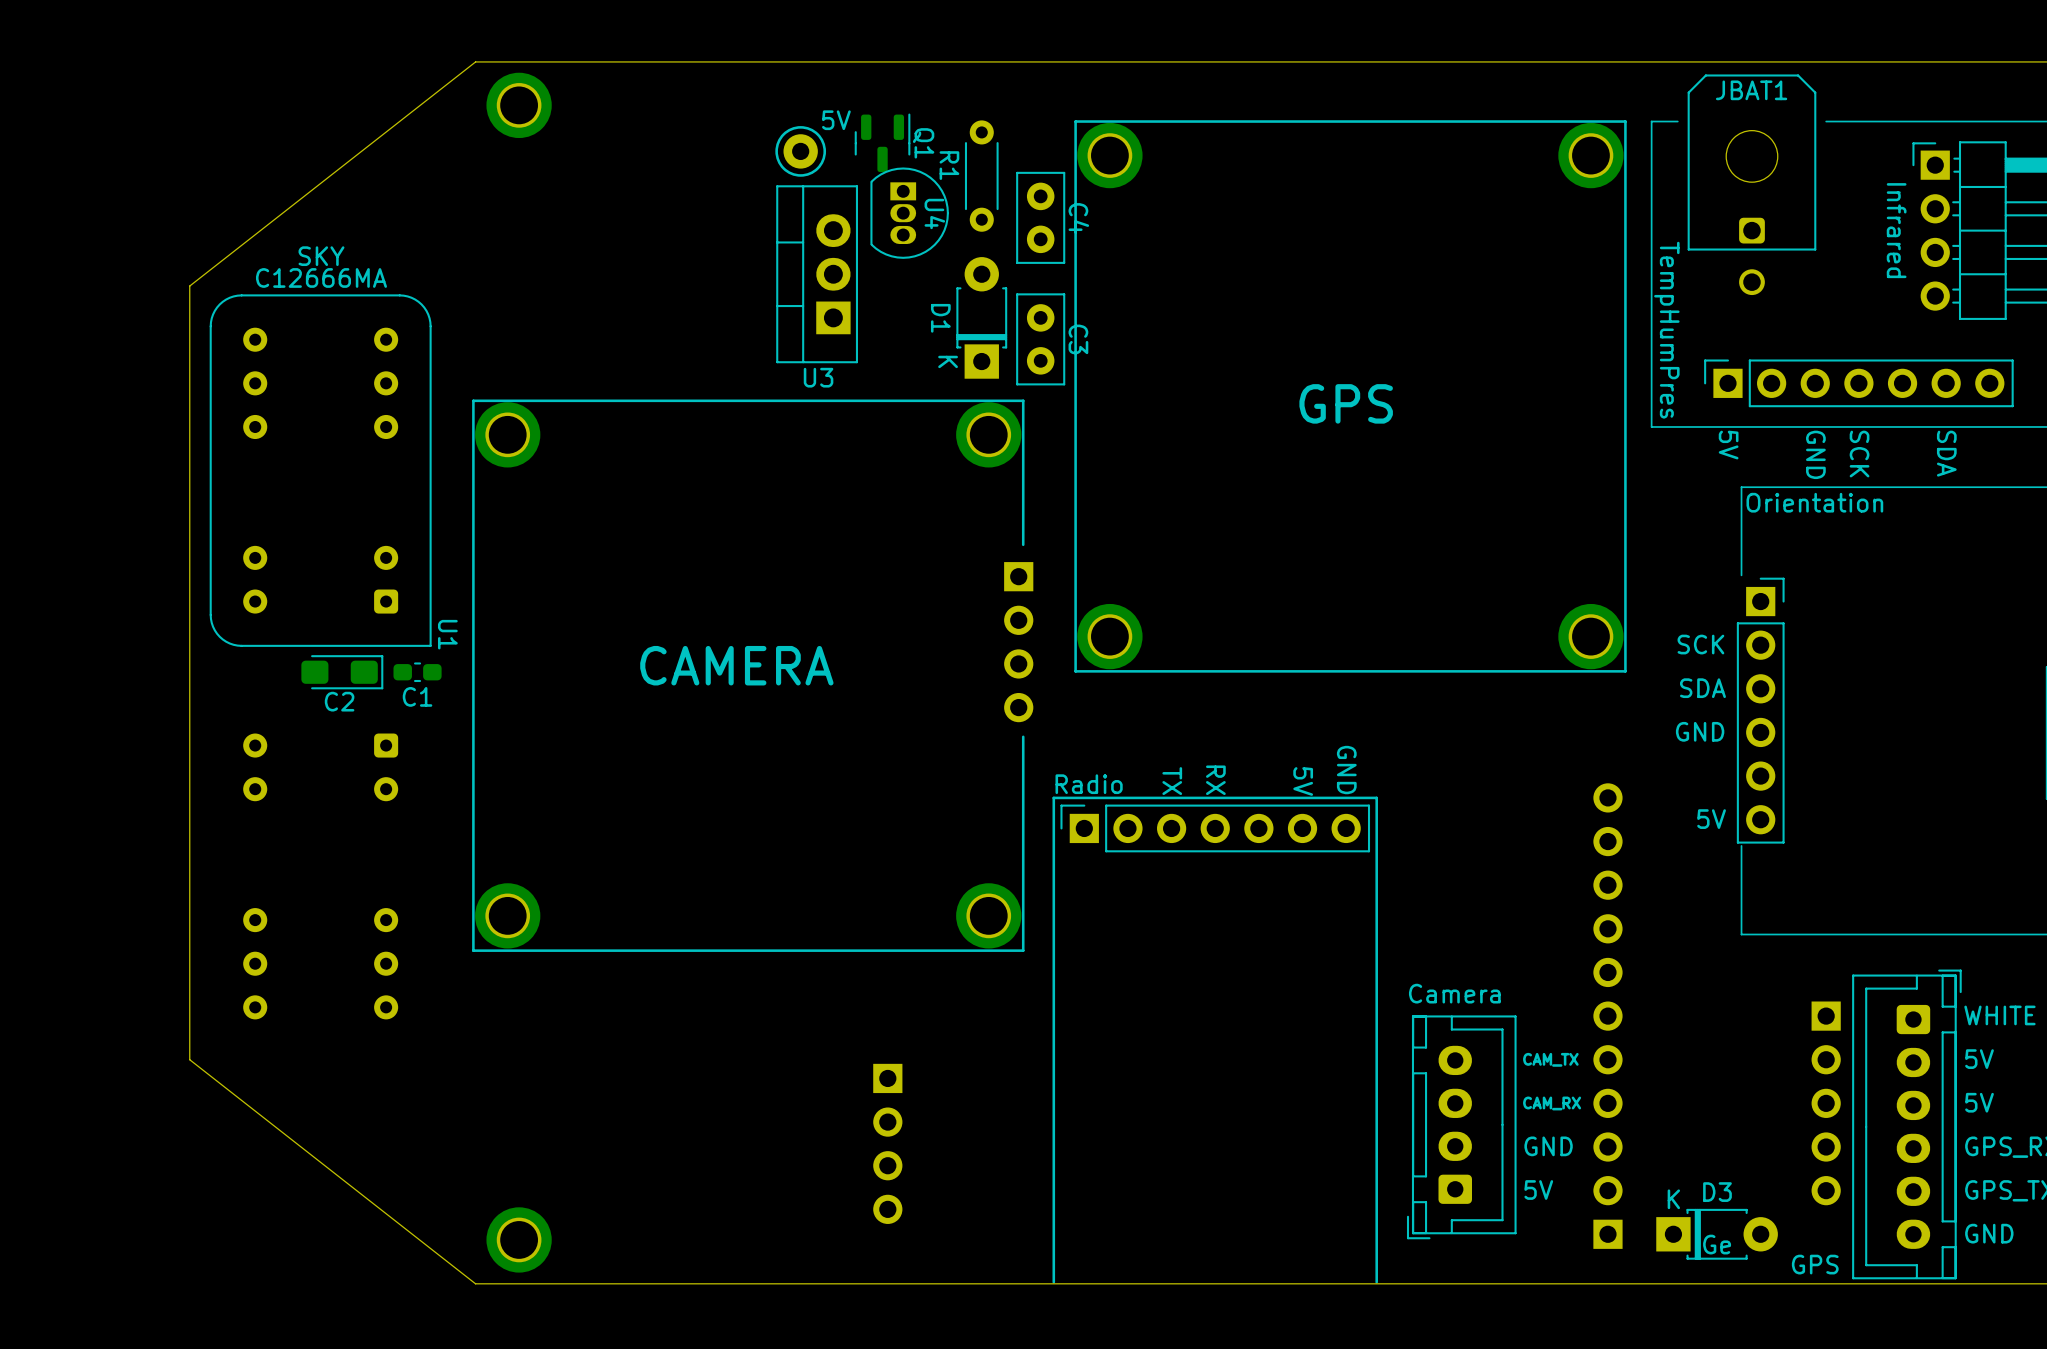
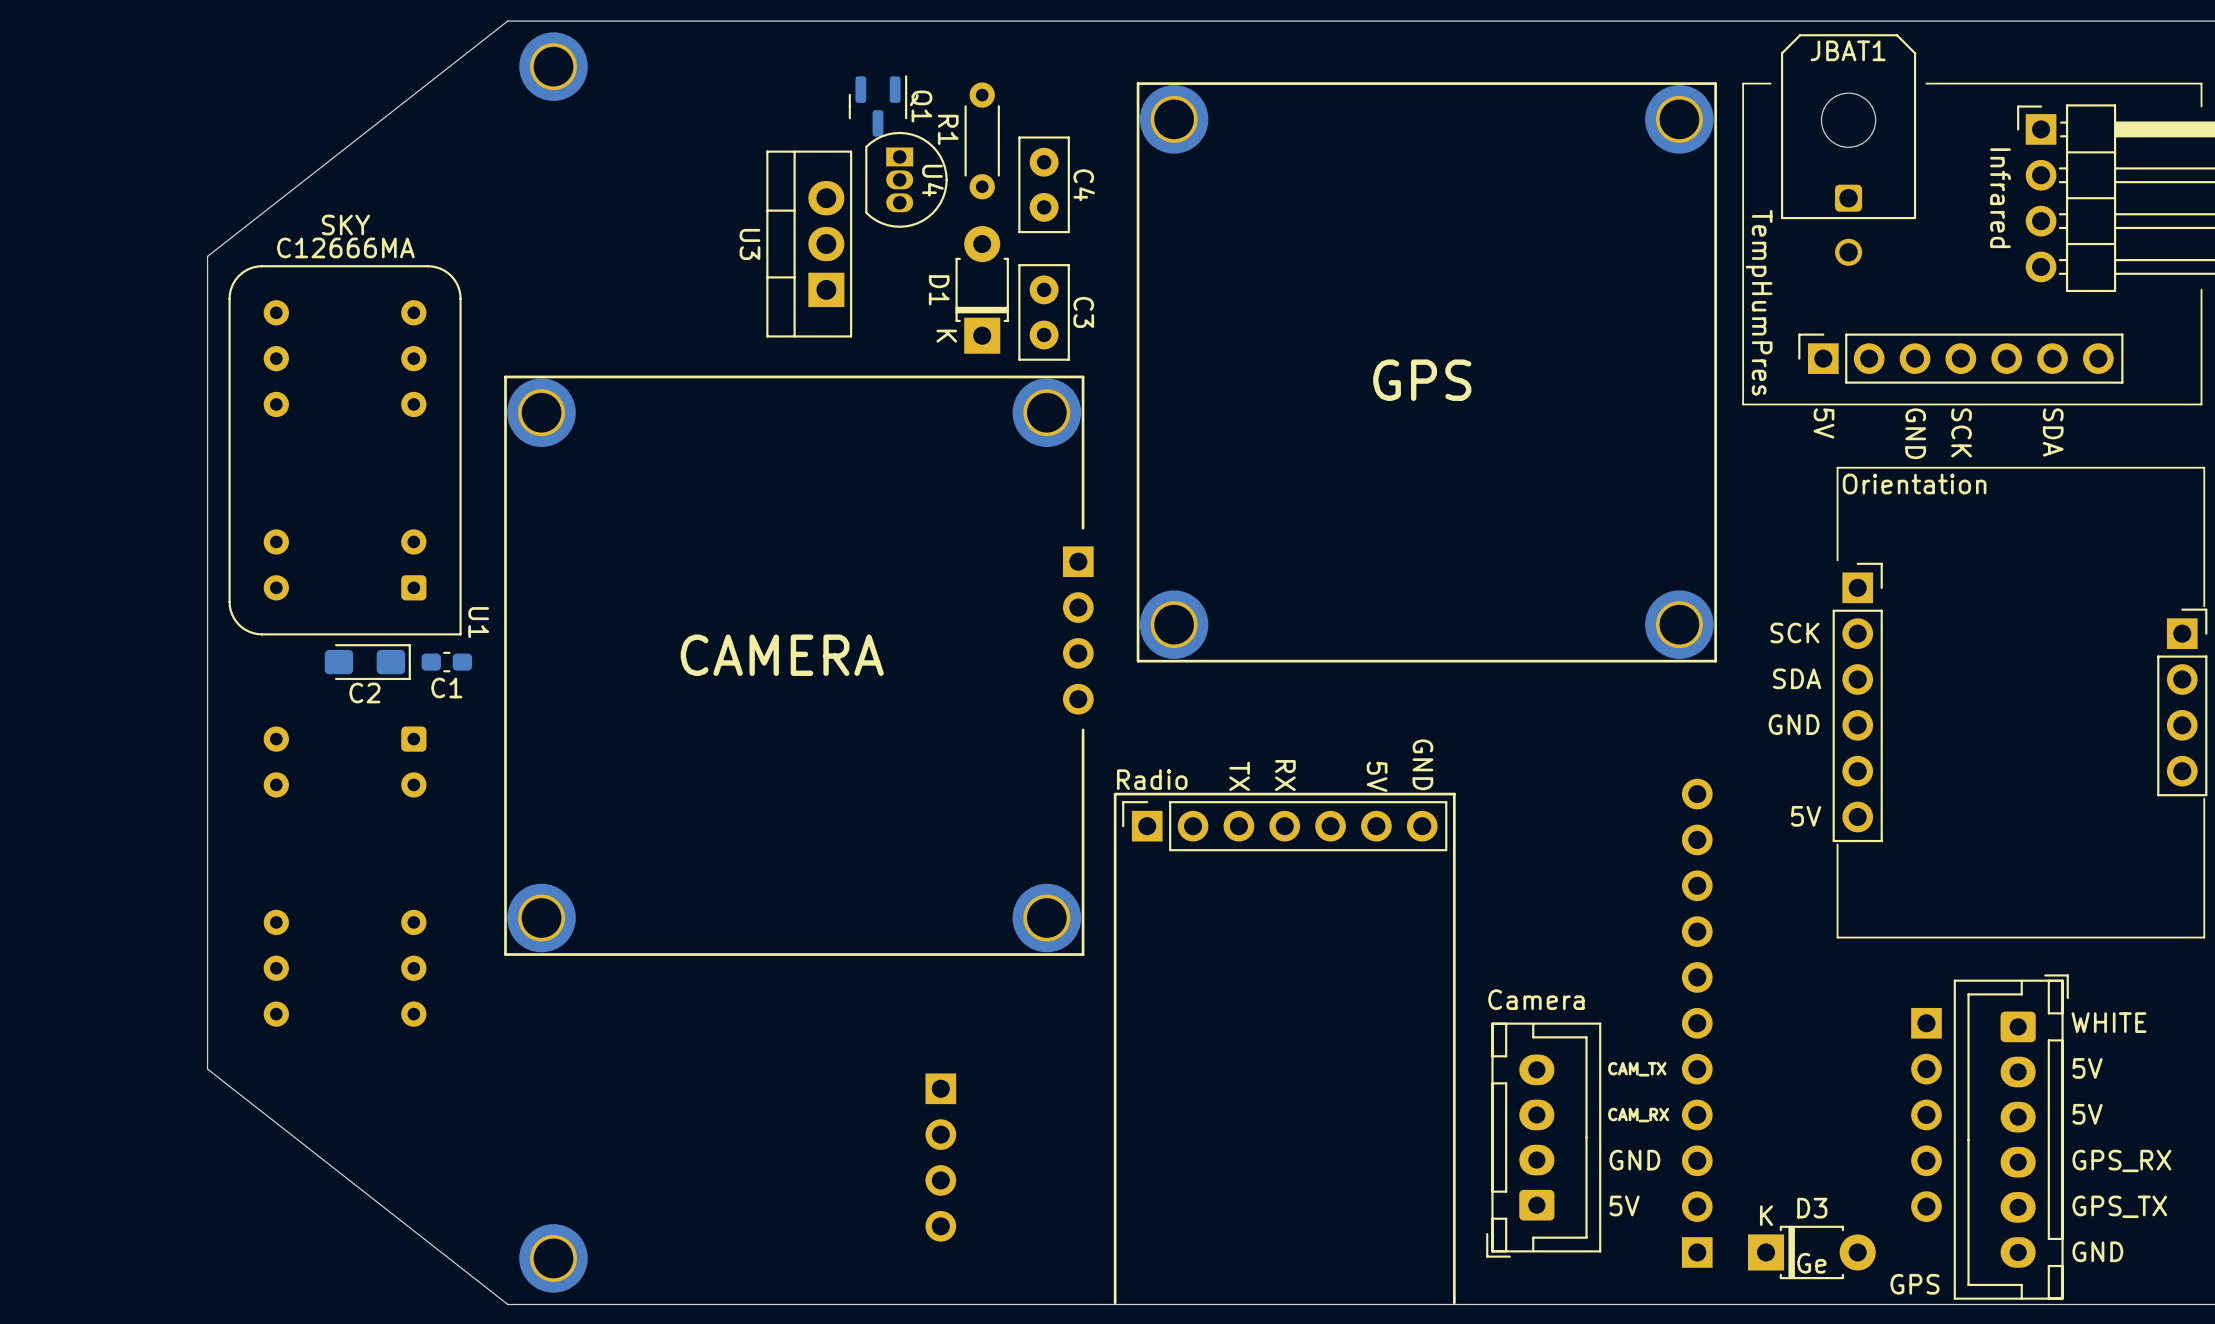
text: 5V (836, 120) -> none
Q1 position: (882, 142) -> (877, 105)
part: (800, 151) -> none
R1 position: (981, 176) -> (982, 140)
U4 position: (909, 213) -> (906, 179)
C4 position: (1040, 217) -> (1044, 184)
U3 position: (817, 274) -> (809, 244)
D1 position: (981, 317) -> (982, 289)
C3 position: (1040, 339) -> (1044, 312)
U3 name rotation: 0° (818, 377) -> 90° clockwise (749, 244)
U3 name position: U3 (818, 377) -> U3 (749, 244)

